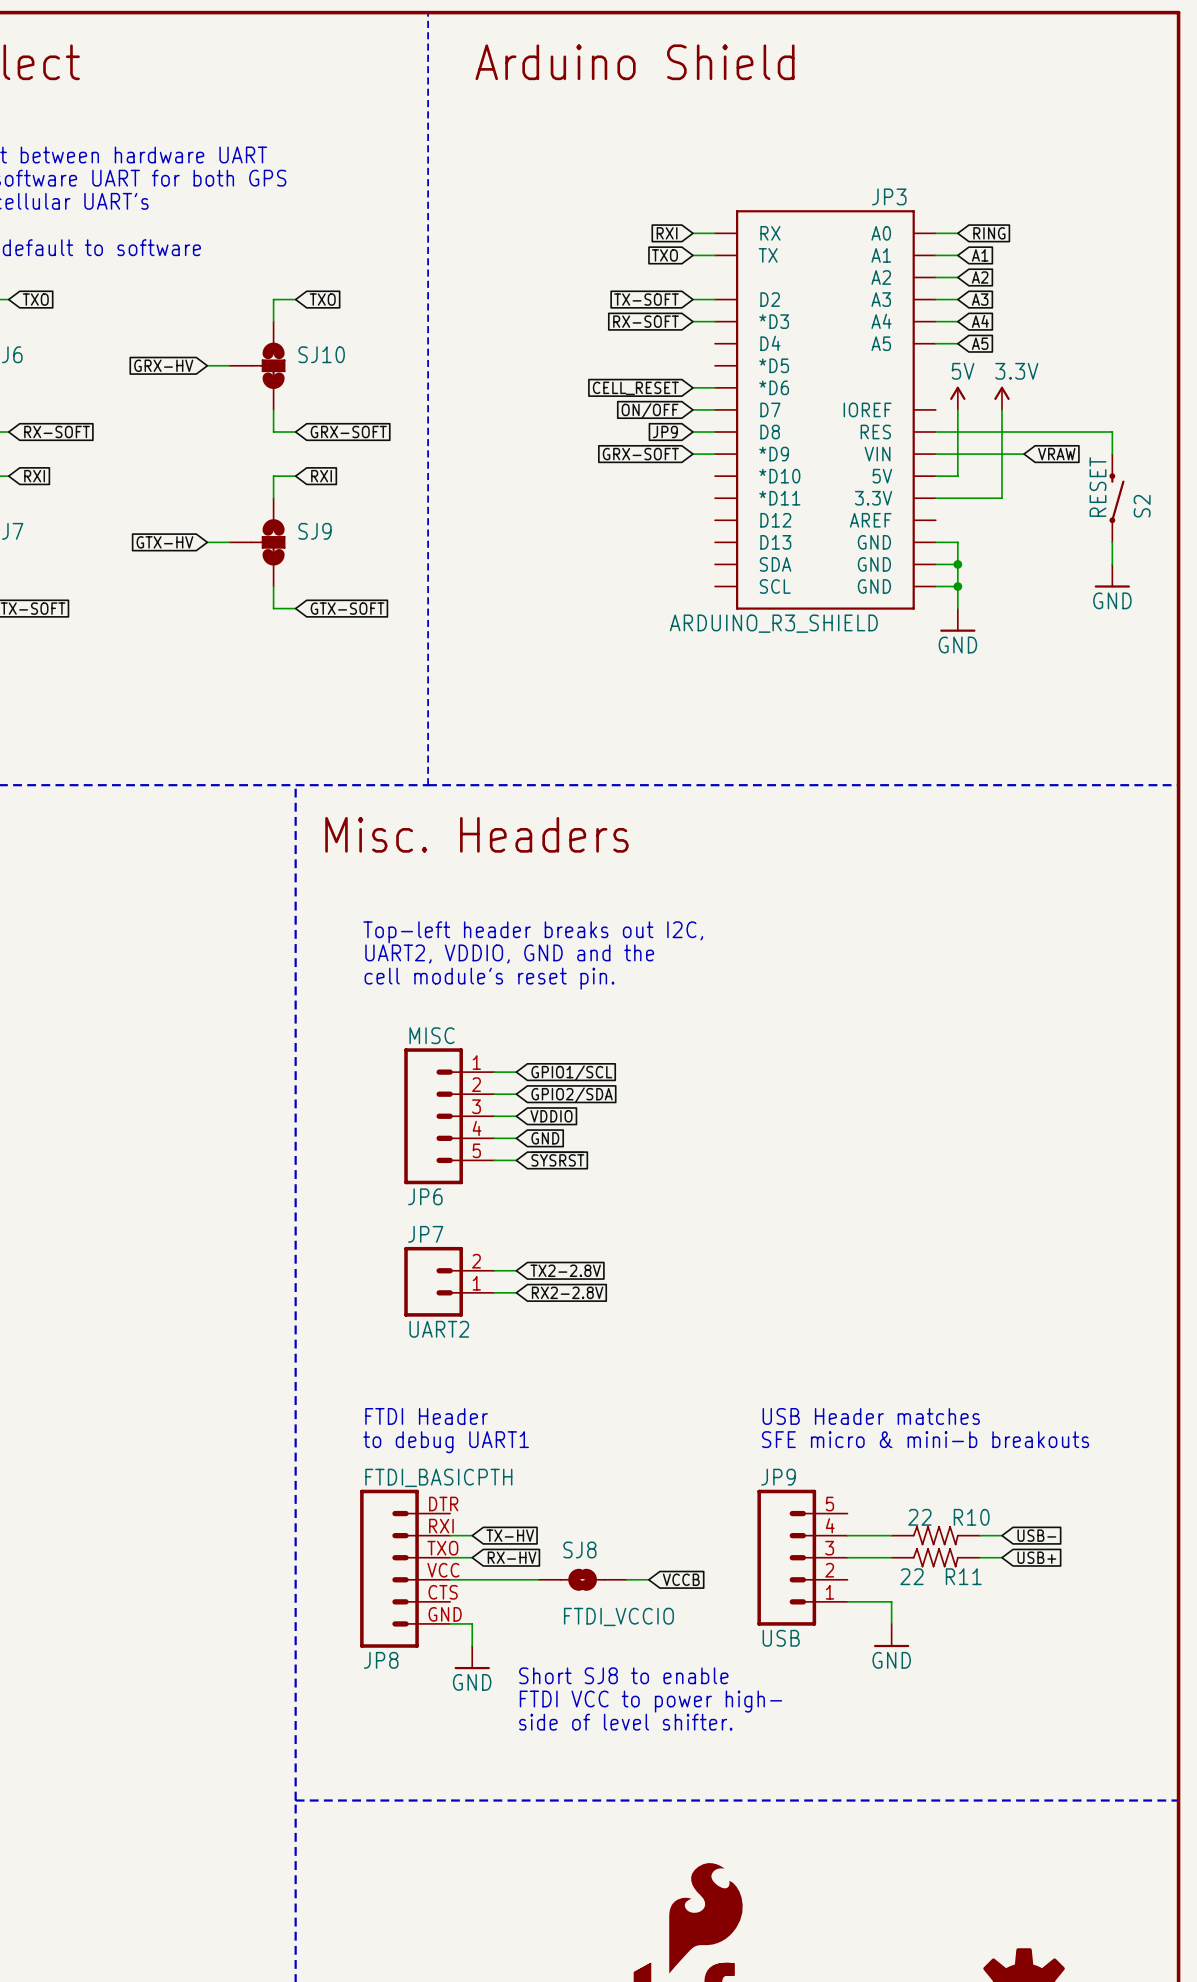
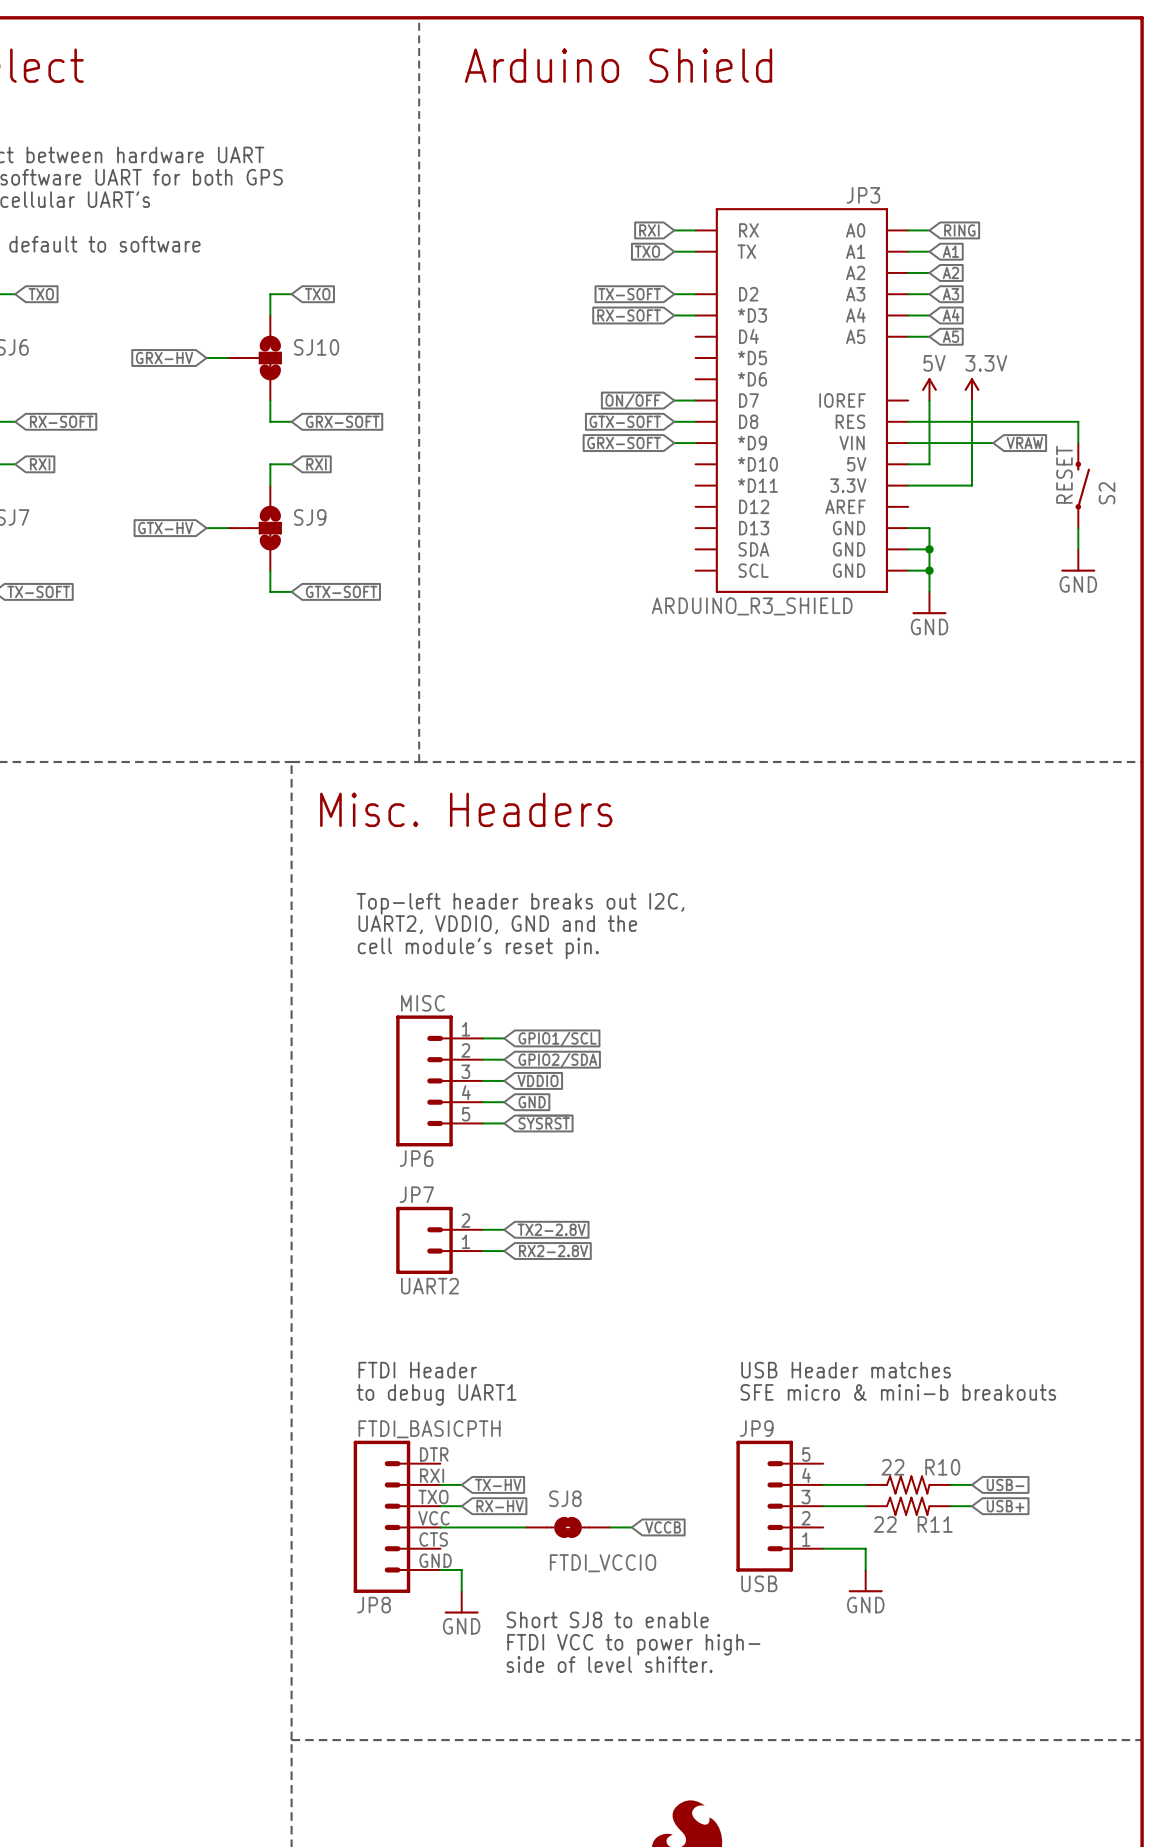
wire: (692, 387) (715, 387) -> none
global label: CELL_RESET (635, 388) -> none
global label: JP9 (665, 432) -> GTX-SOFT (625, 421)

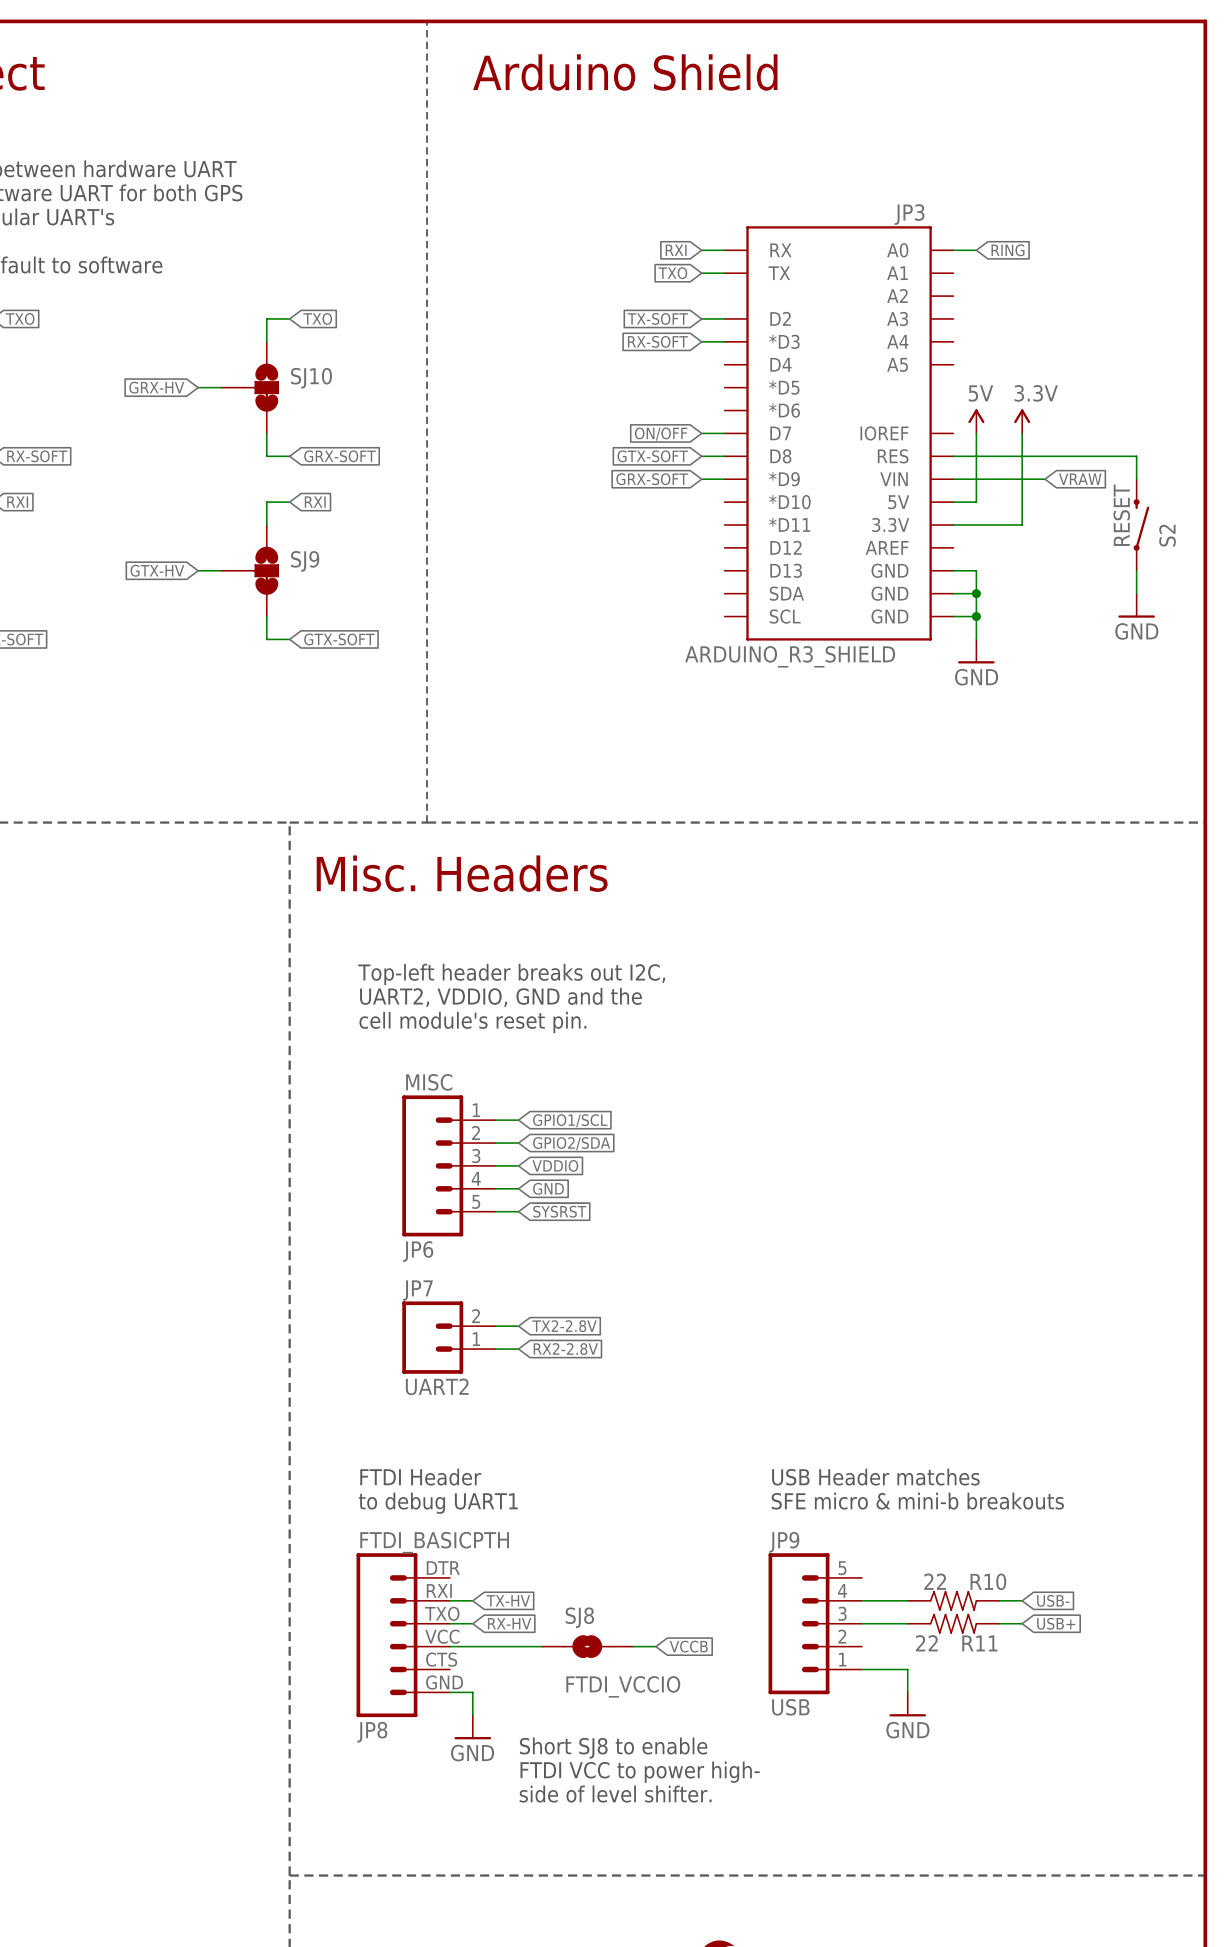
wire: (908, 251) (929, 251) -> none
global label: A1 (950, 251) -> none
wire: (908, 272) (929, 272) -> none
global label: A2 (950, 272) -> none
wire: (908, 294) (929, 294) -> none
global label: A3 (950, 294) -> none
wire: (908, 315) (929, 315) -> none
global label: A4 (951, 315) -> none
wire: (908, 336) (929, 336) -> none
global label: A5 (950, 336) -> none

